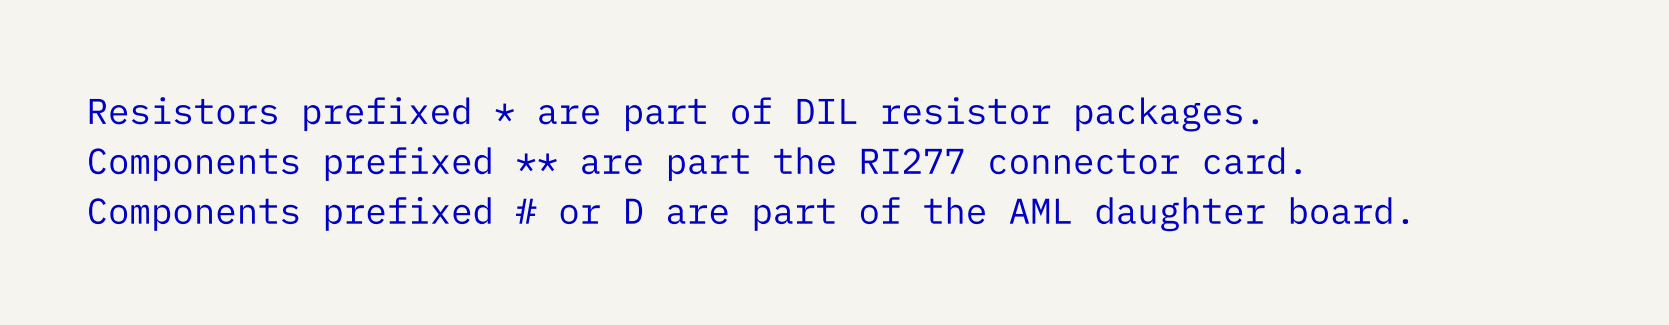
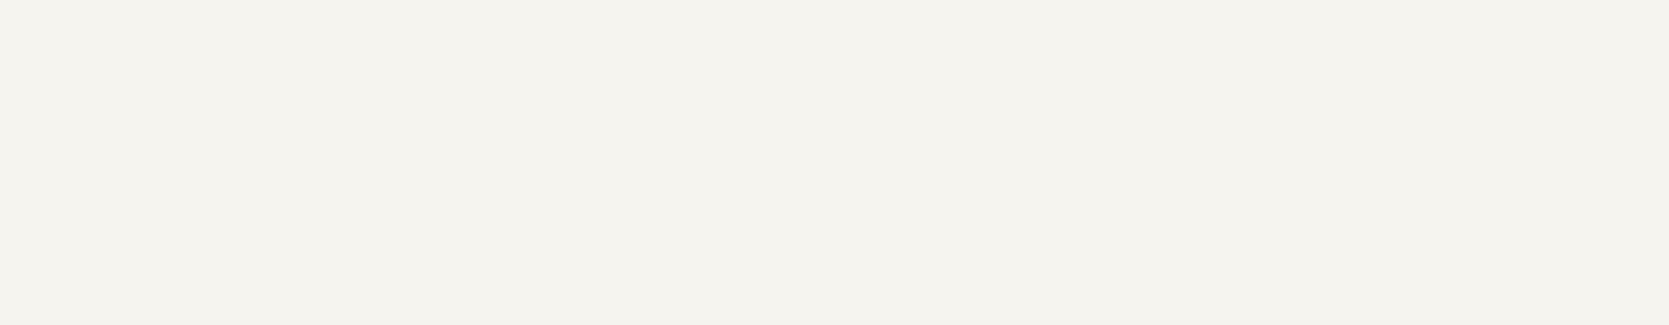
text: Resistors prefixed * are part of DIL resistor packages. (673, 114) -> none
text: Components prefixed ** are part the RI277 connector card. (694, 164) -> none
text: Components prefixed # or D are part of the AML daughter board. (748, 214) -> none

